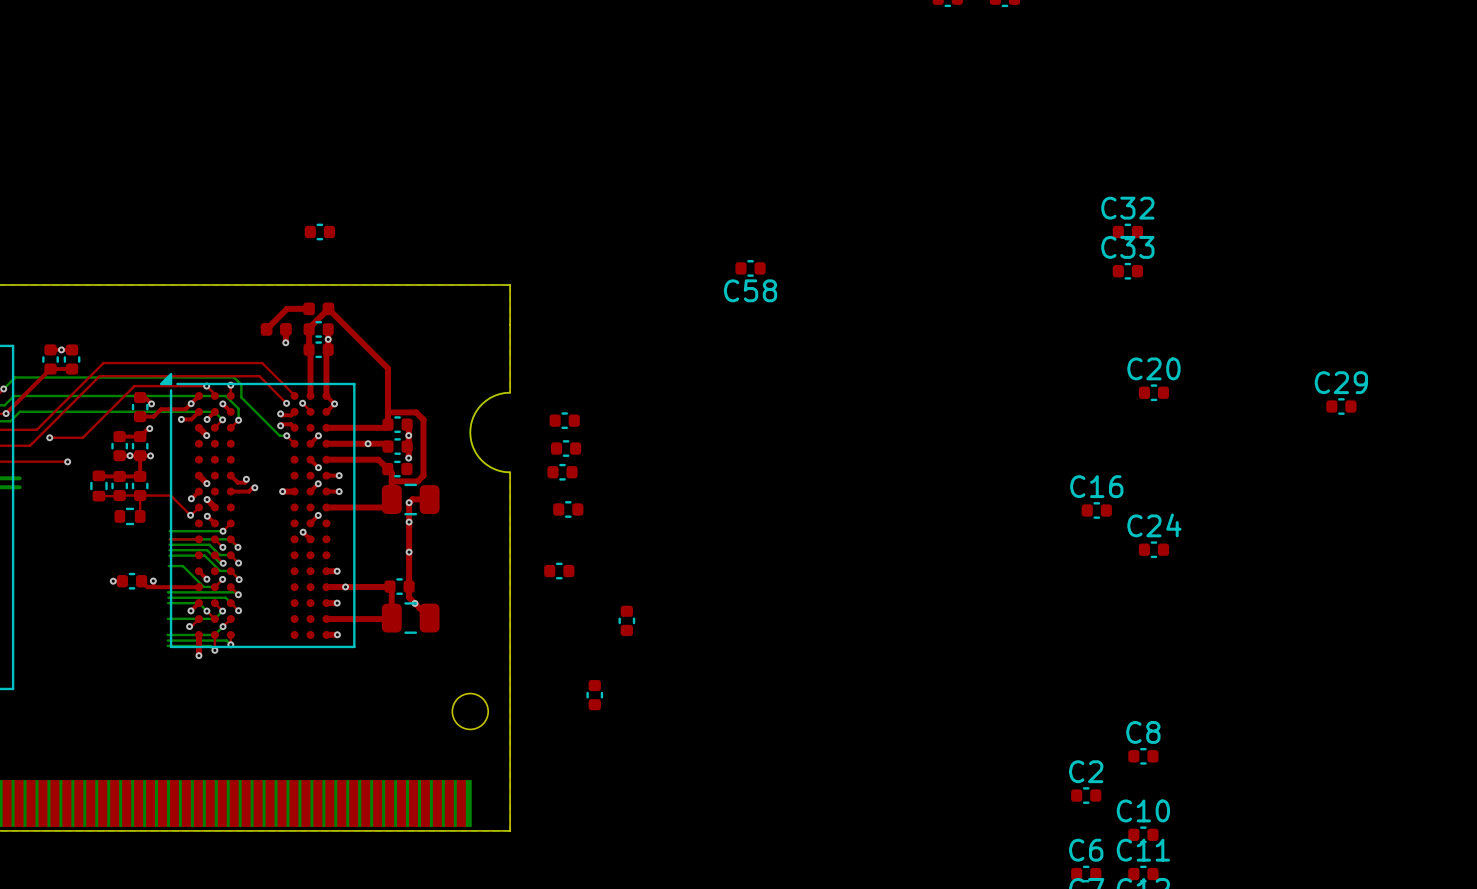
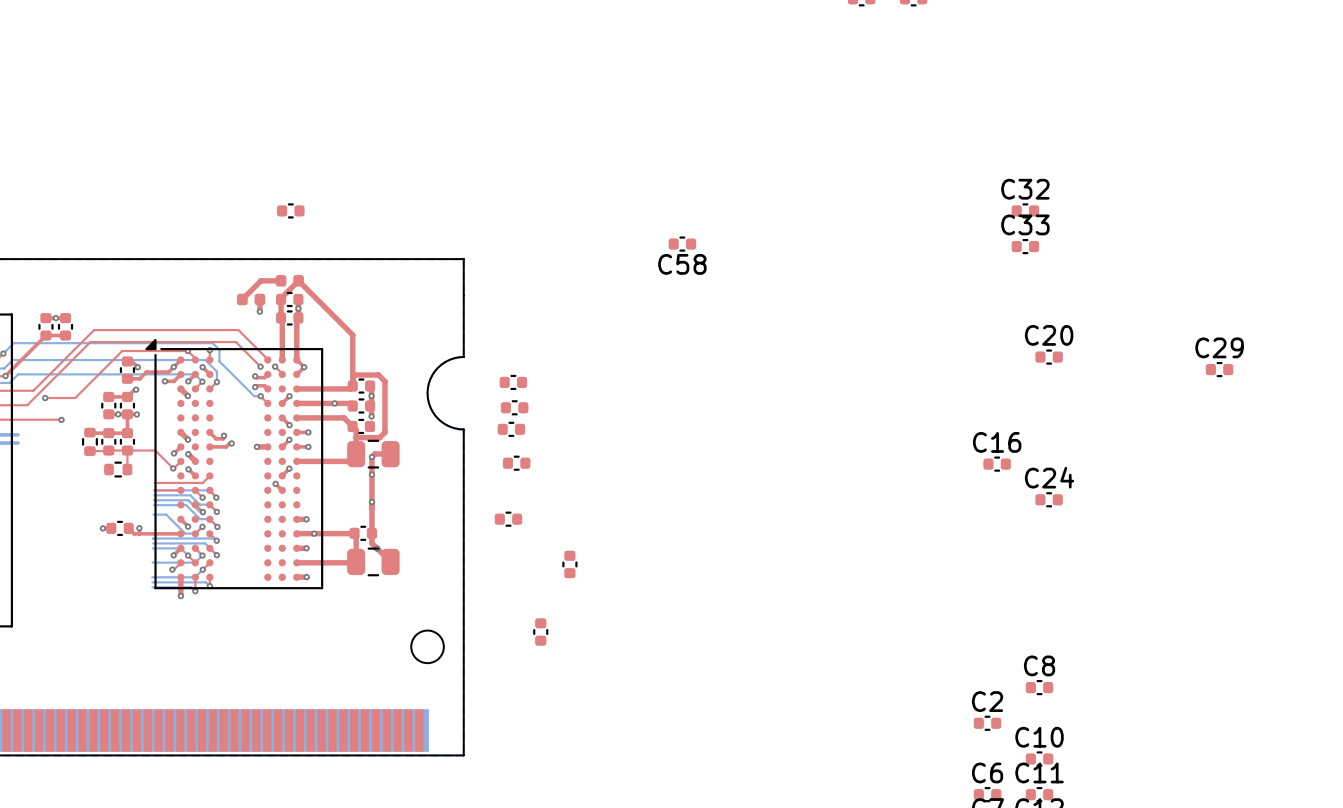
bottom track: (169, 531) (223, 531) -> none
top track: none -> (154, 482) (202, 482)
via: (223, 531) -> none

